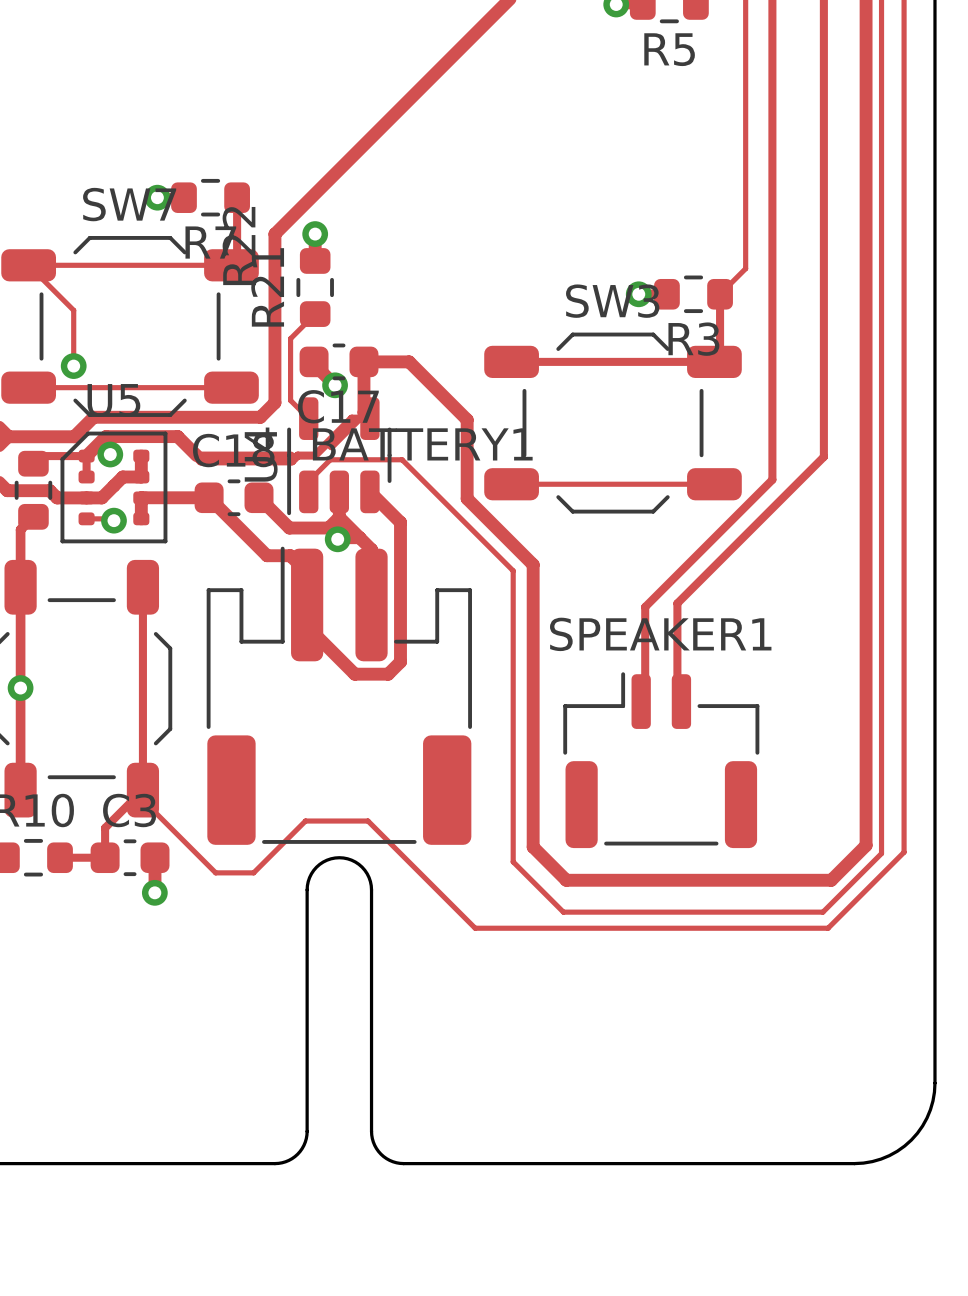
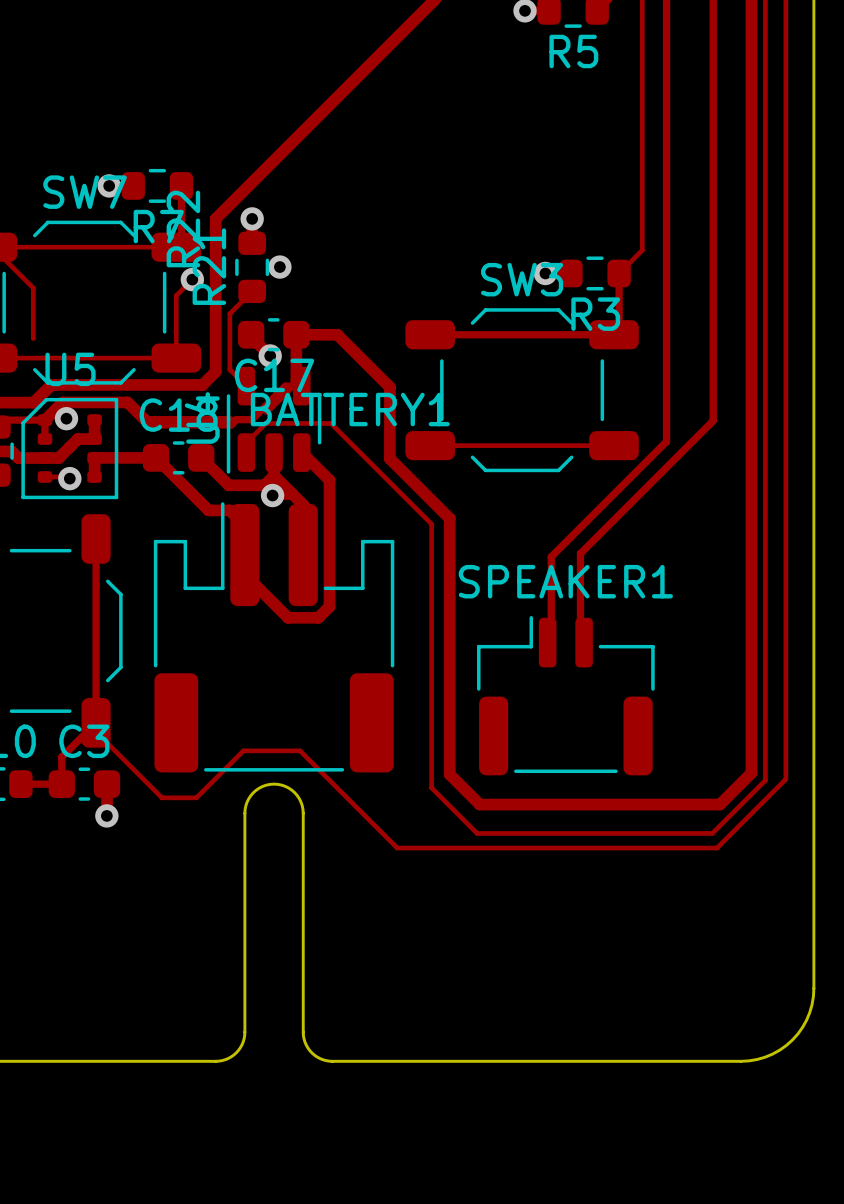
via: none -> (279, 267)
track: none -> (192, 279) (176, 295) (176, 358)
via: none -> (192, 279)
via: (73, 366) -> none

